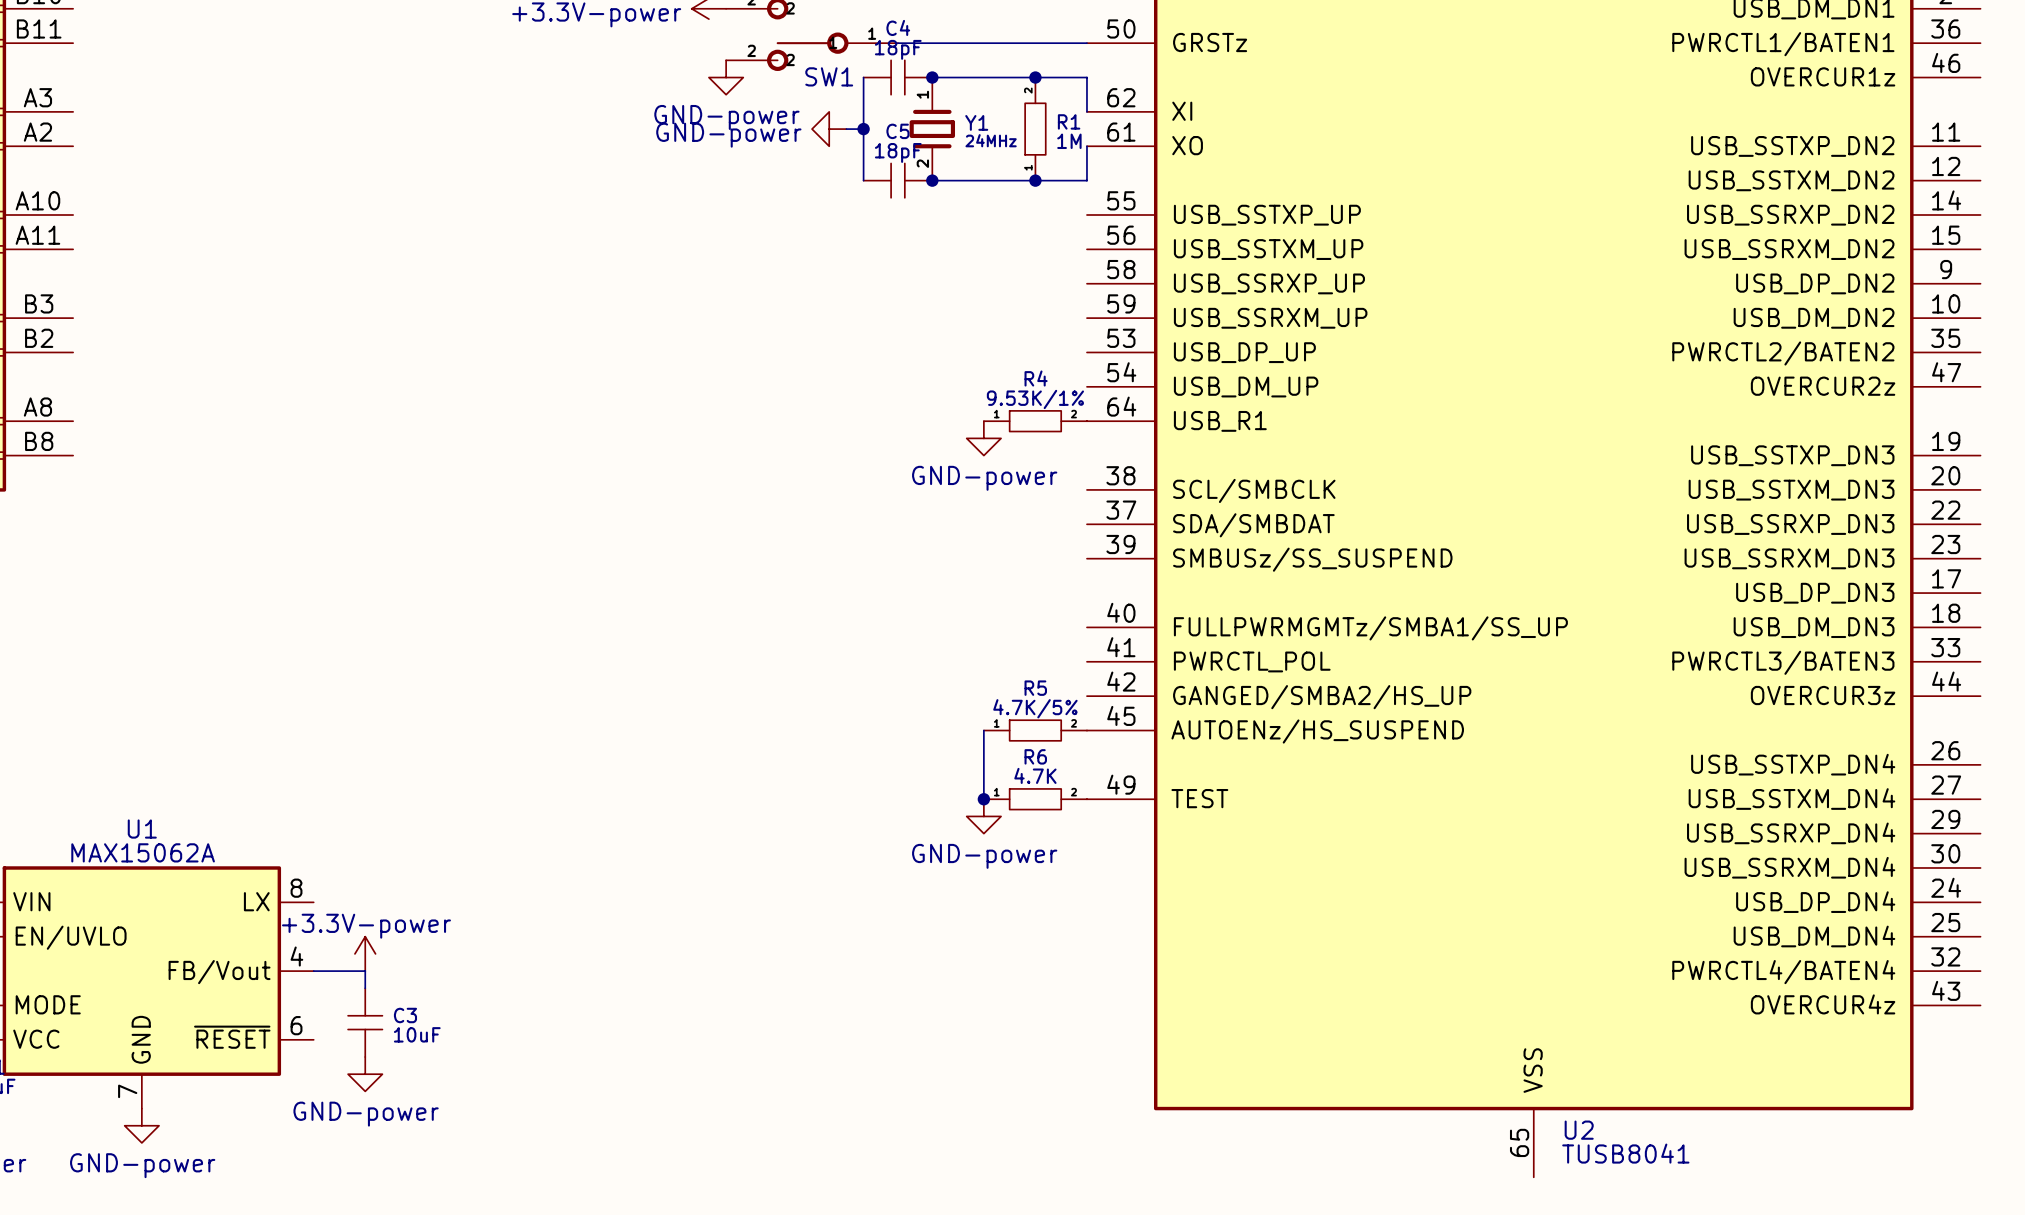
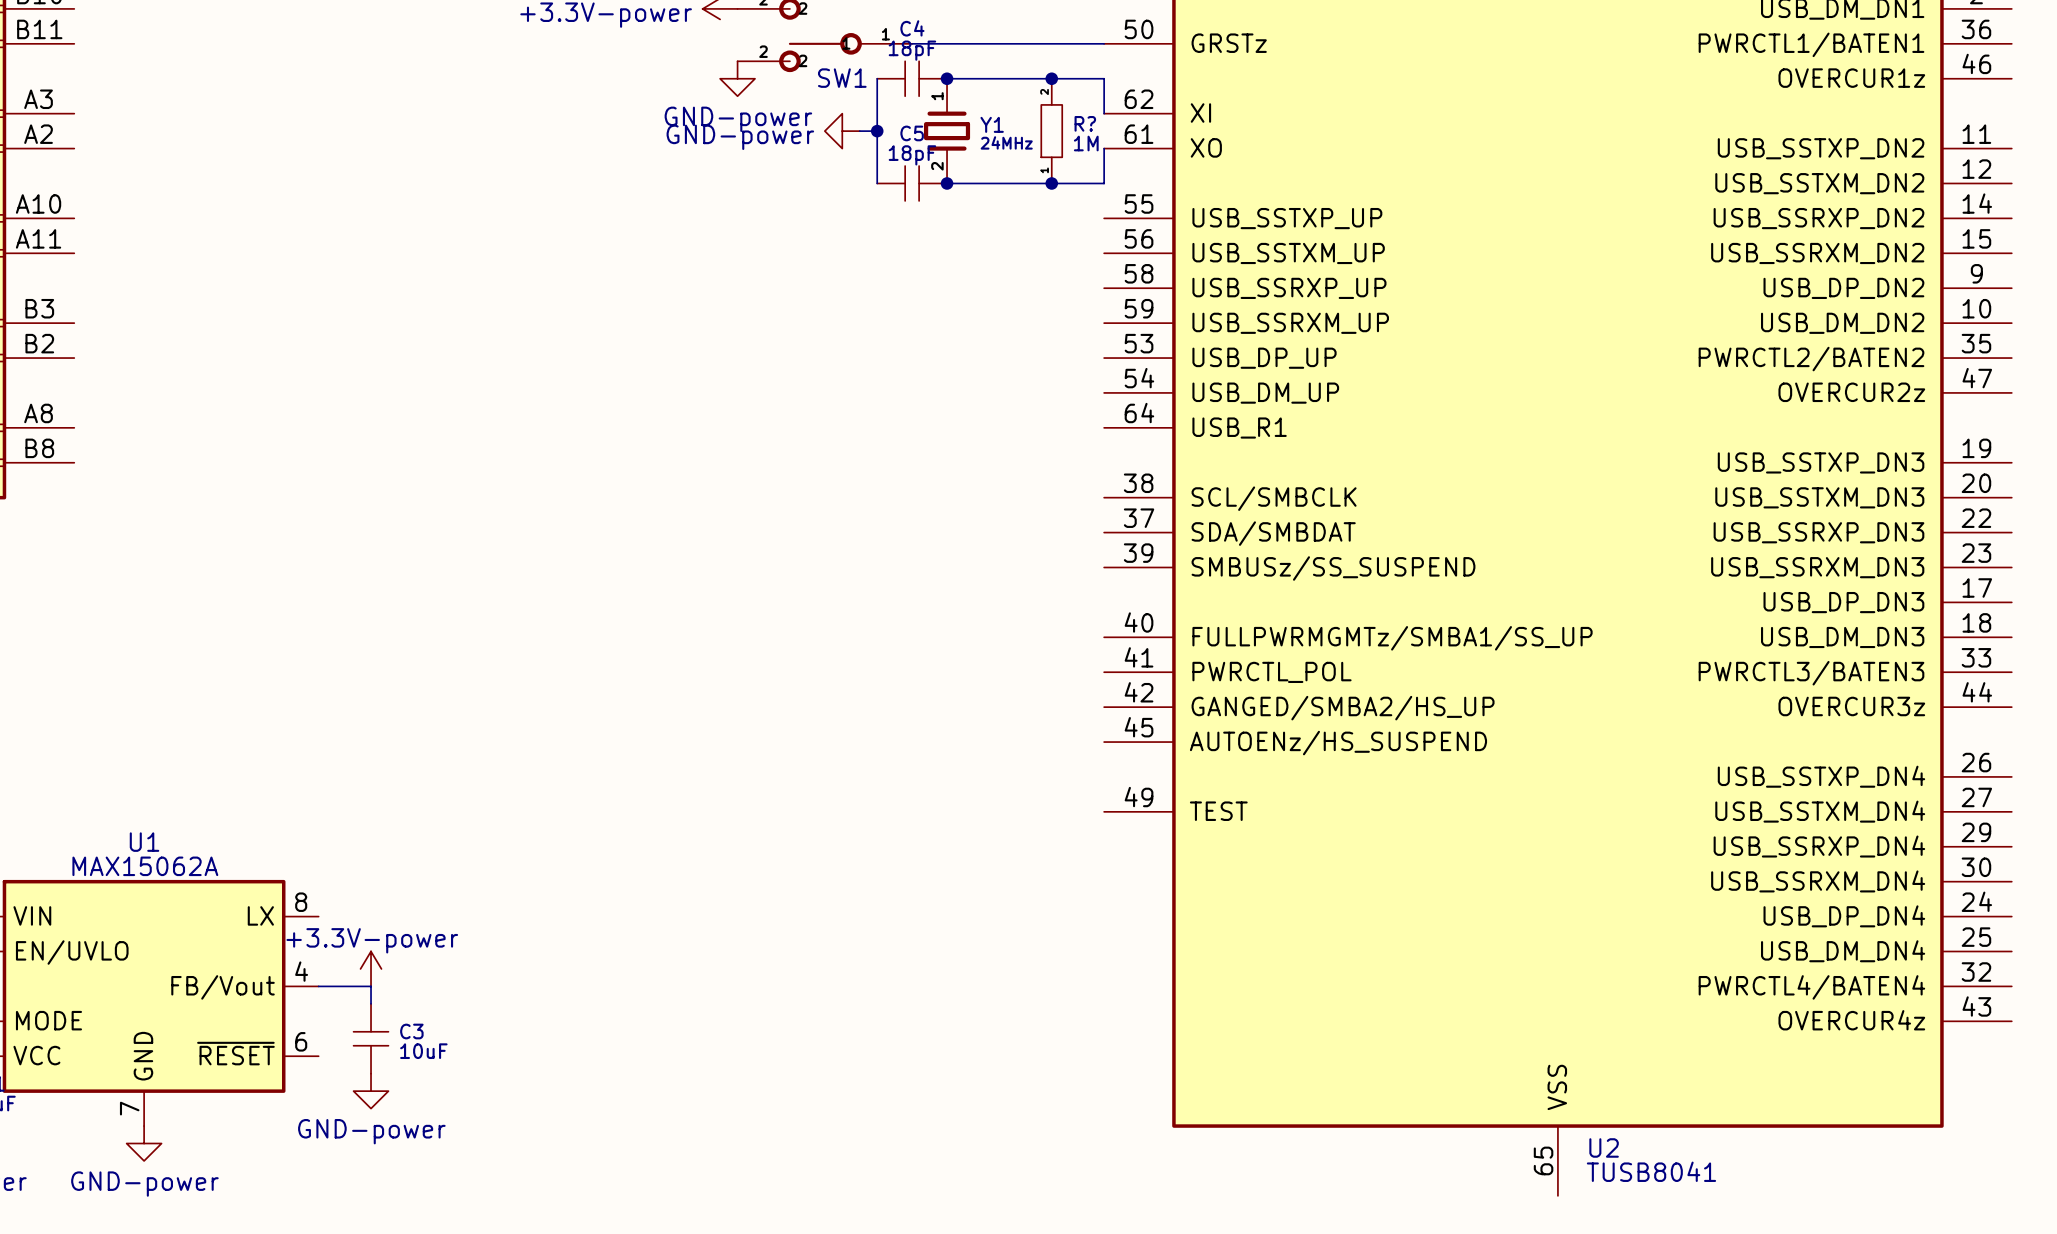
R1 name: R1 (1069, 121) -> R? (1085, 123)
R4: 9.53K/1% (1035, 421) -> none
power symbol: GND-power (983, 438) -> none
wire: (983, 730) (983, 799) -> none
R5: 4.7K/5% (1035, 730) -> none
junction: (983, 799) -> none
R6: 4.7K (1035, 799) -> none
power symbol: GND-power (983, 816) -> none

